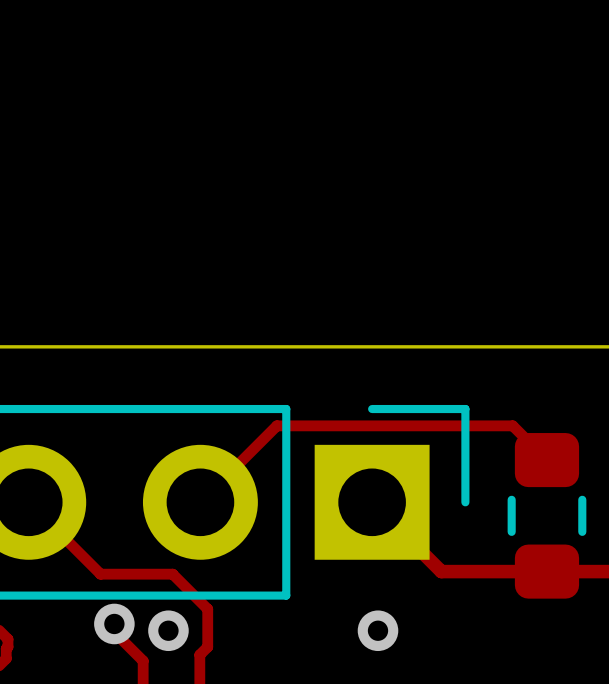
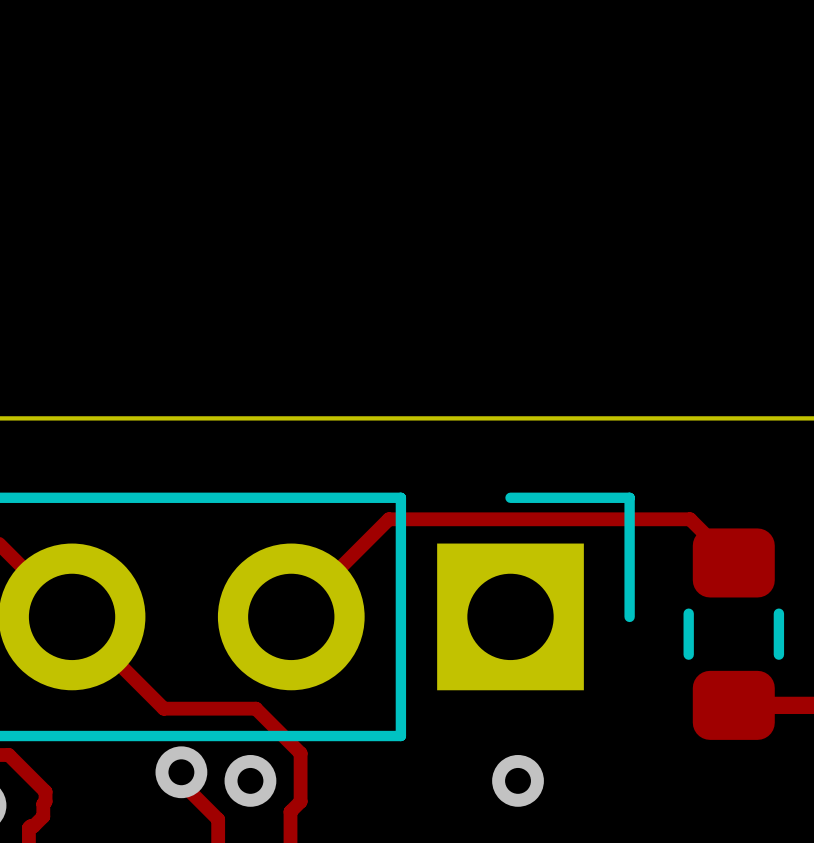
track: (372, 502) (441, 571) (546, 571) -> none

